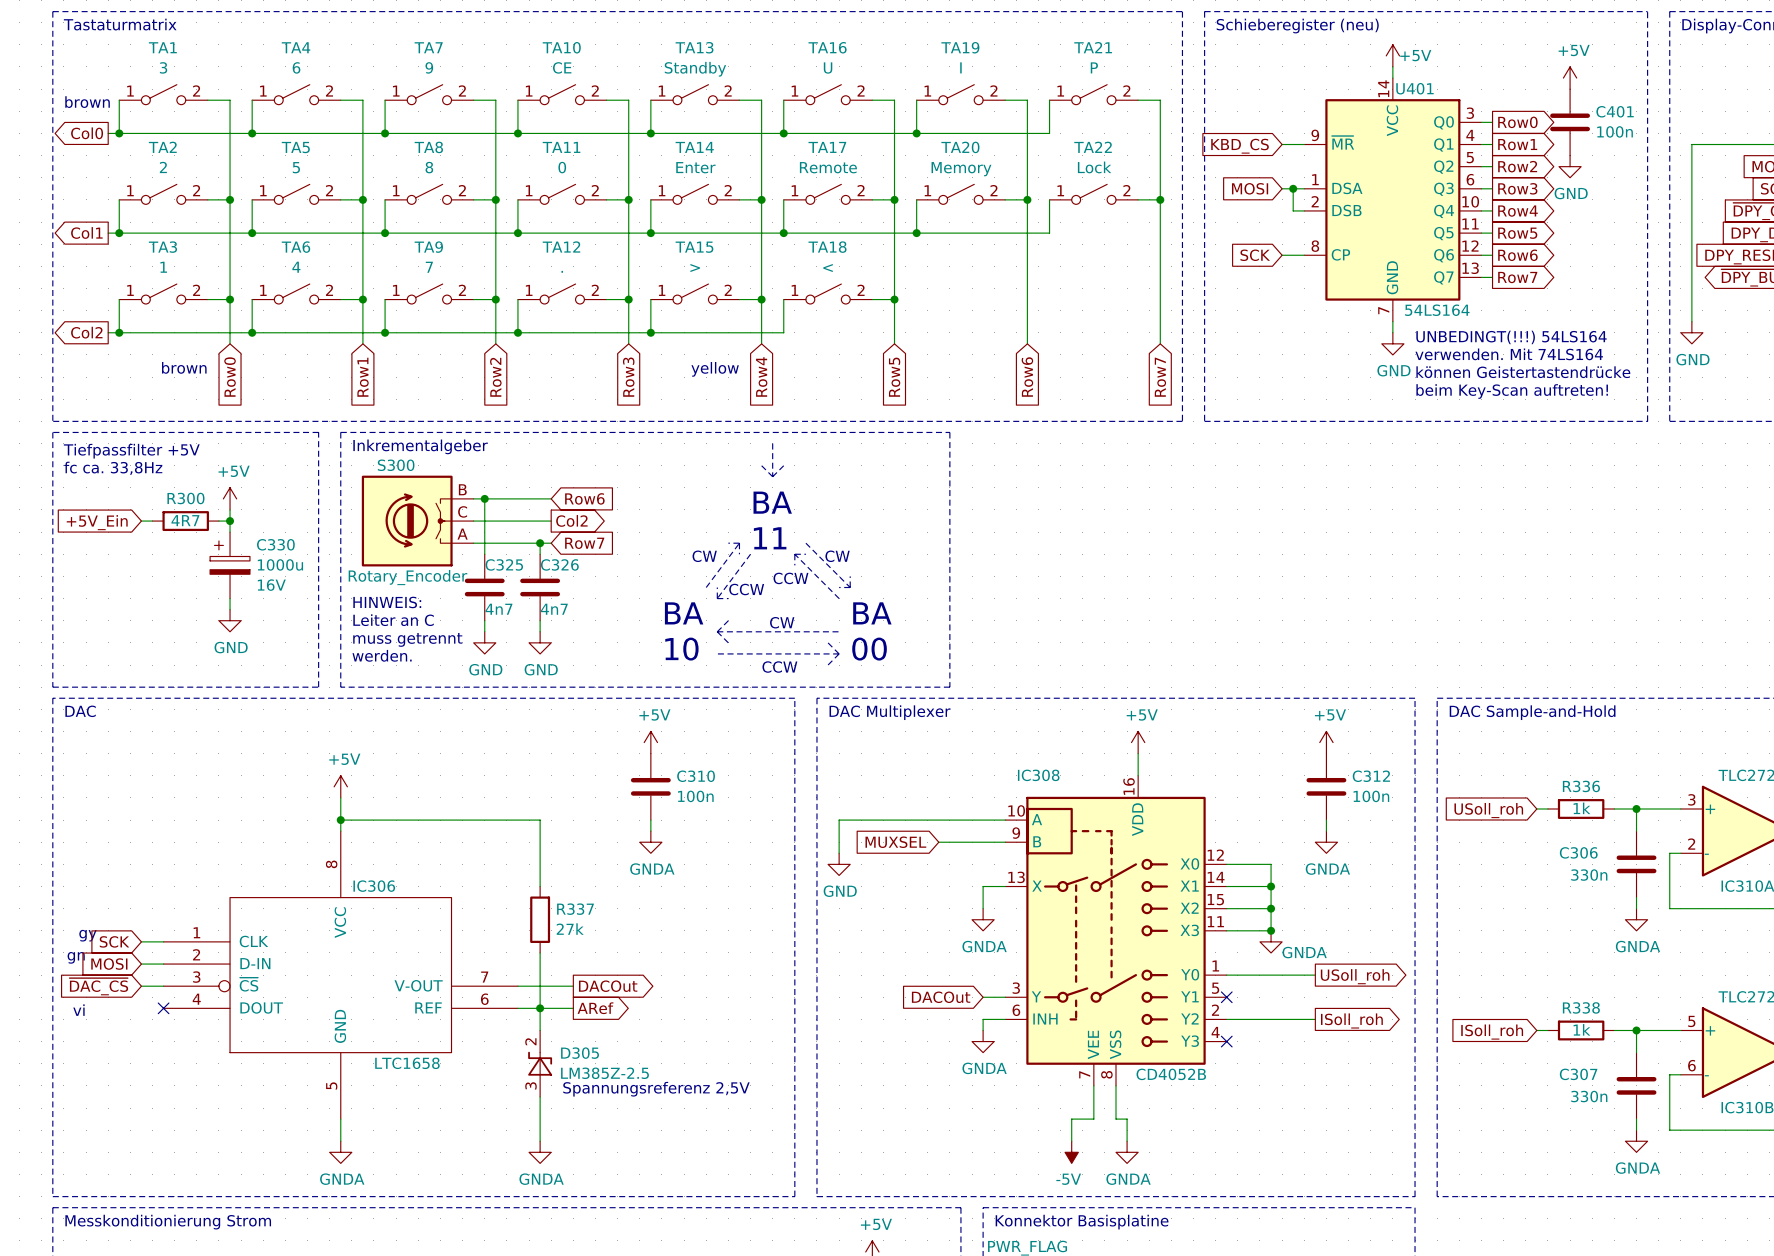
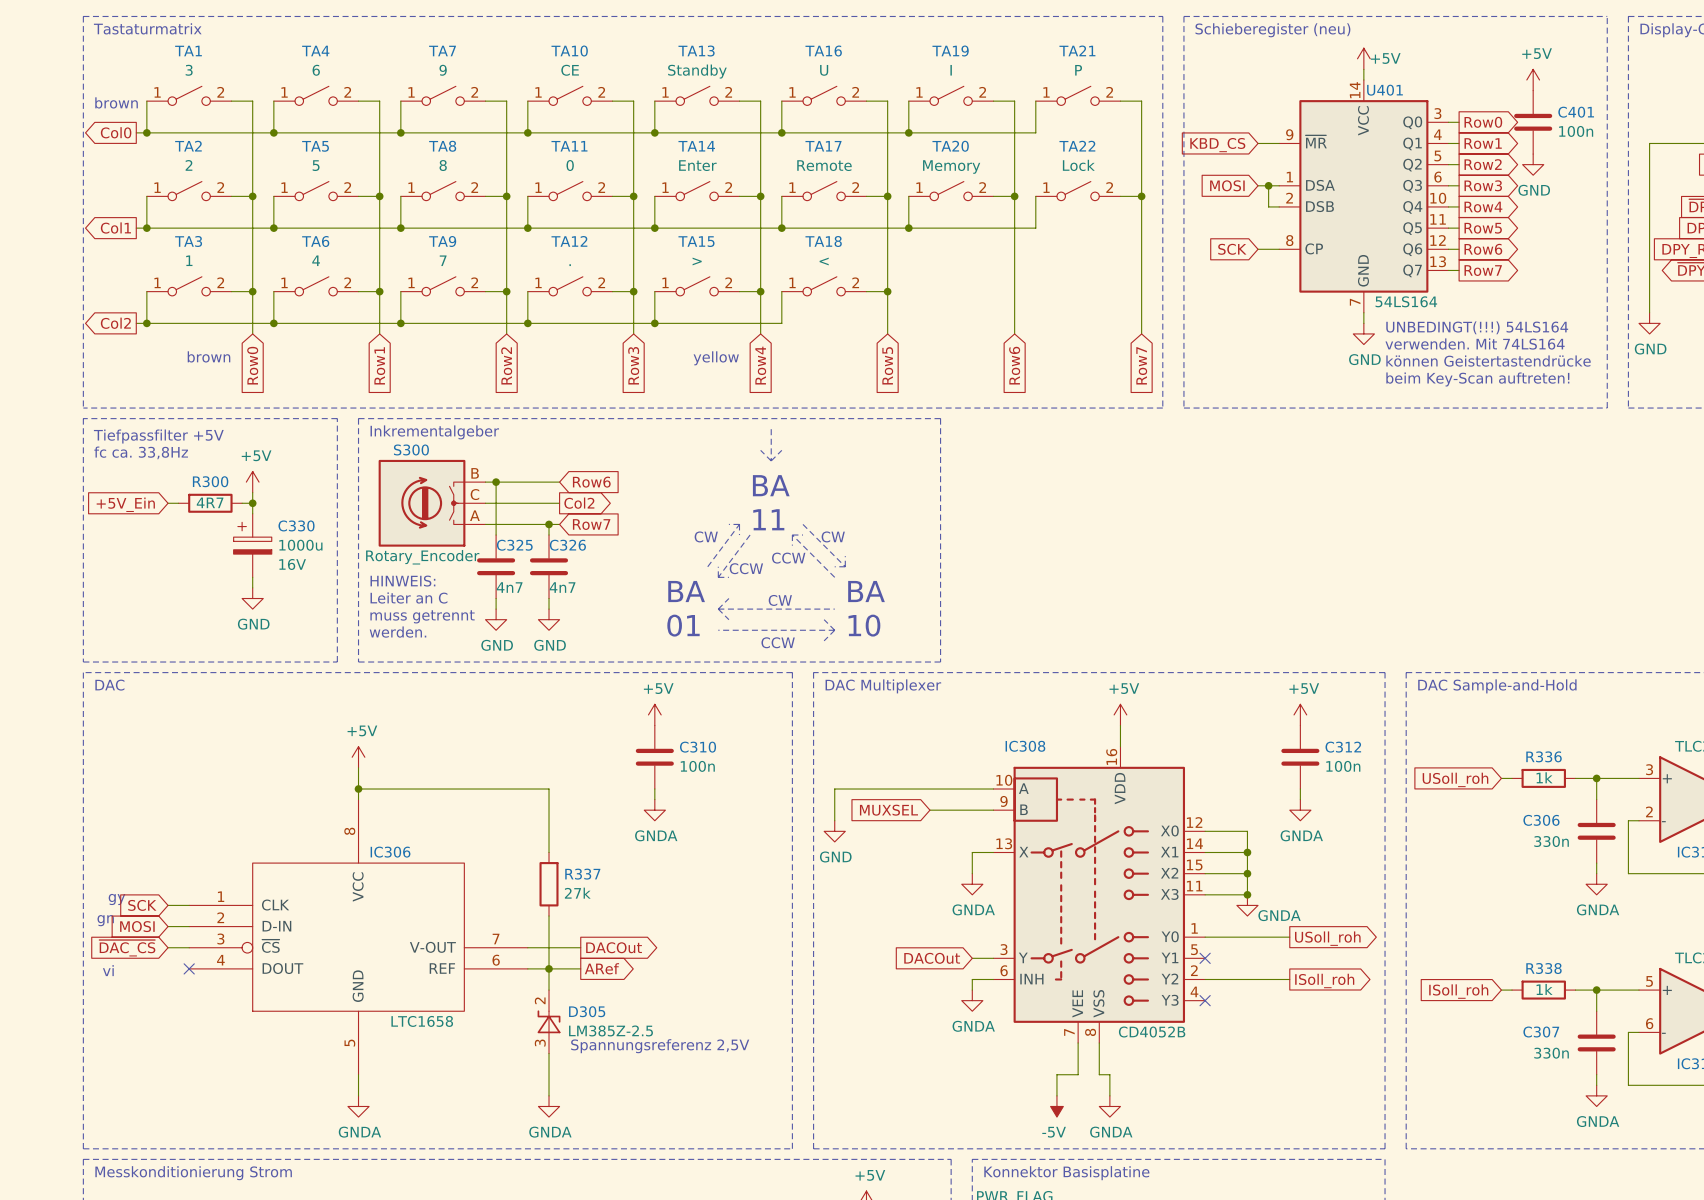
text: 10 (681, 649) -> 01 (683, 625)
text: 00 (869, 649) -> 10 (864, 625)

